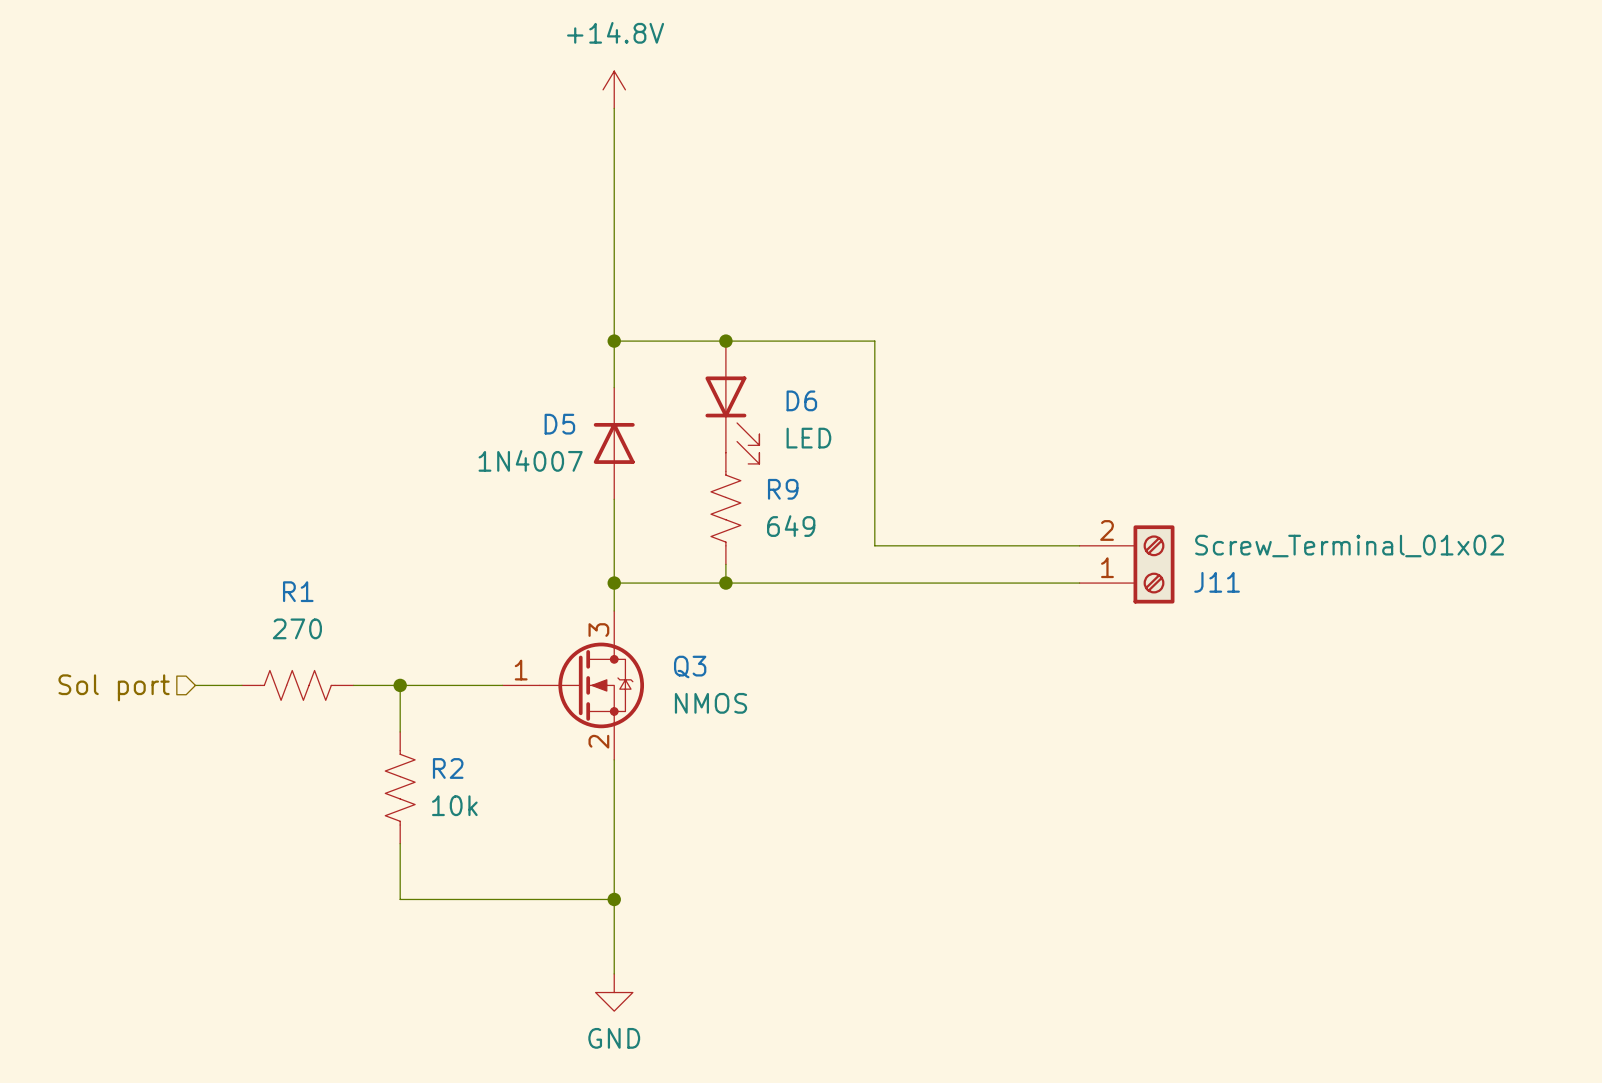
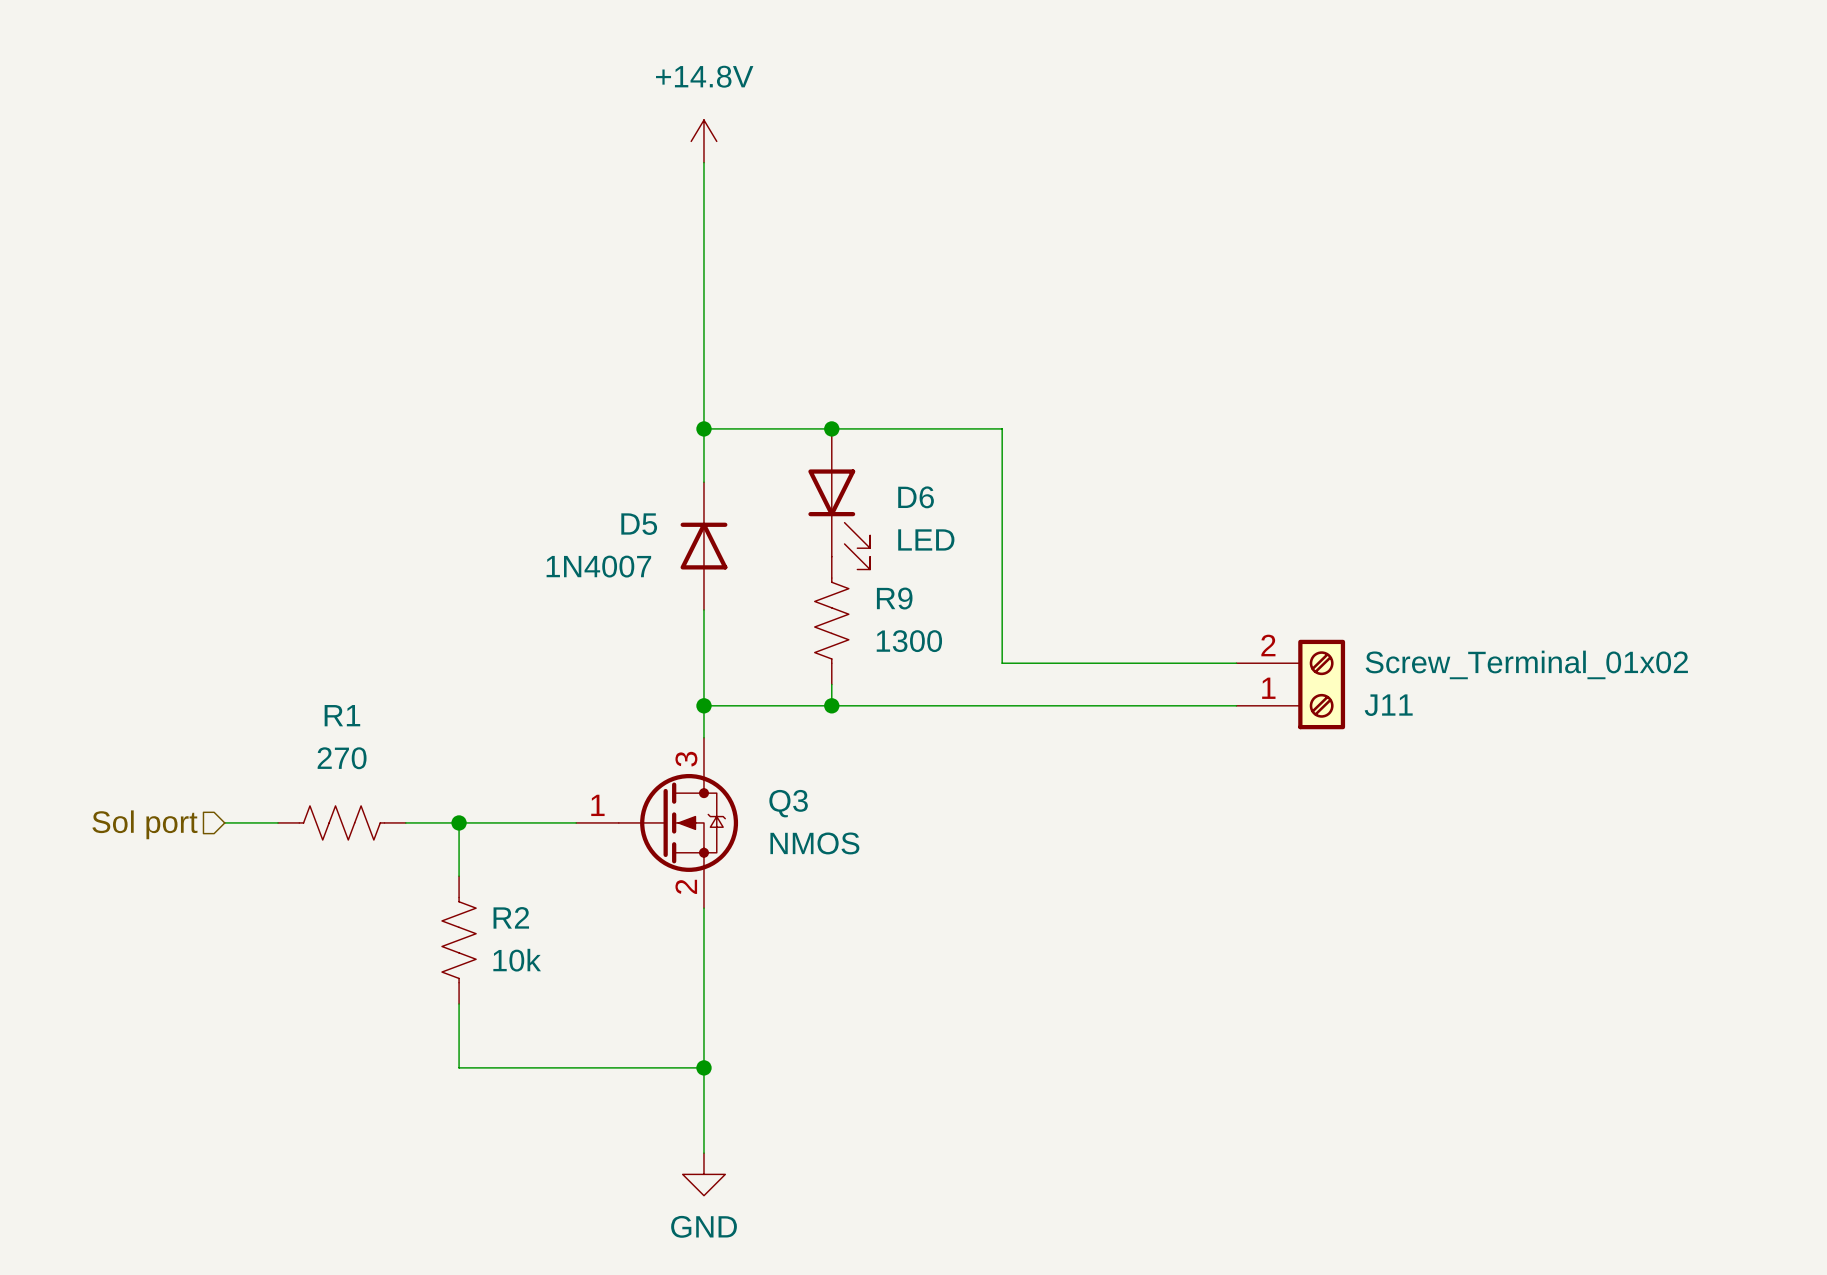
R9 value: 649 (791, 526) -> 1300 (909, 641)

